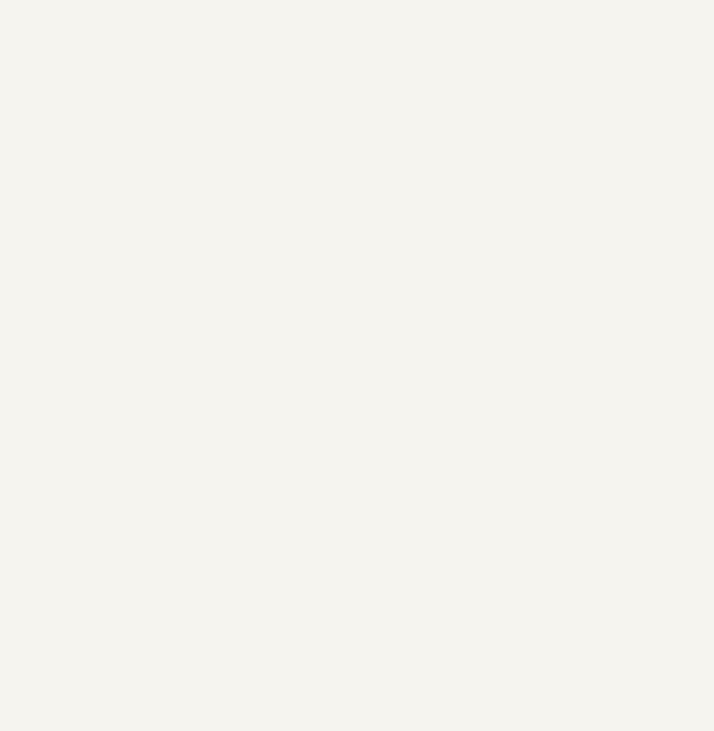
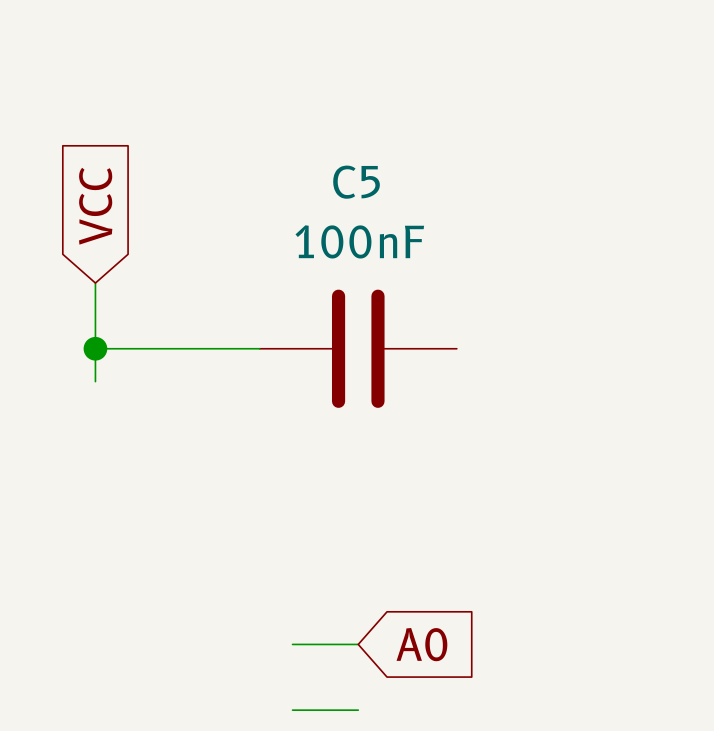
global label: none -> VCC (95, 206)
wire: none -> (95, 283) (95, 381)
wire: none -> (95, 348) (259, 348)
junction: none -> (95, 348)
C5: none -> 100nF (358, 348)
wire: none -> (292, 644) (358, 644)
global label: none -> A0 (421, 644)
wire: none -> (292, 710) (358, 710)

